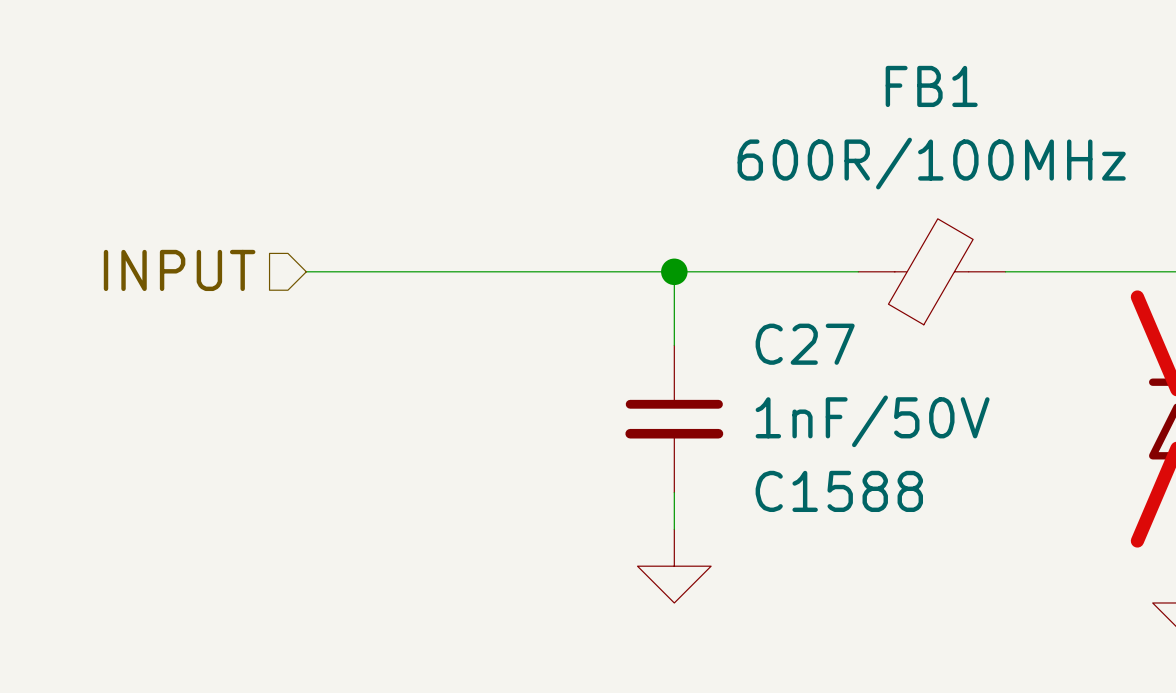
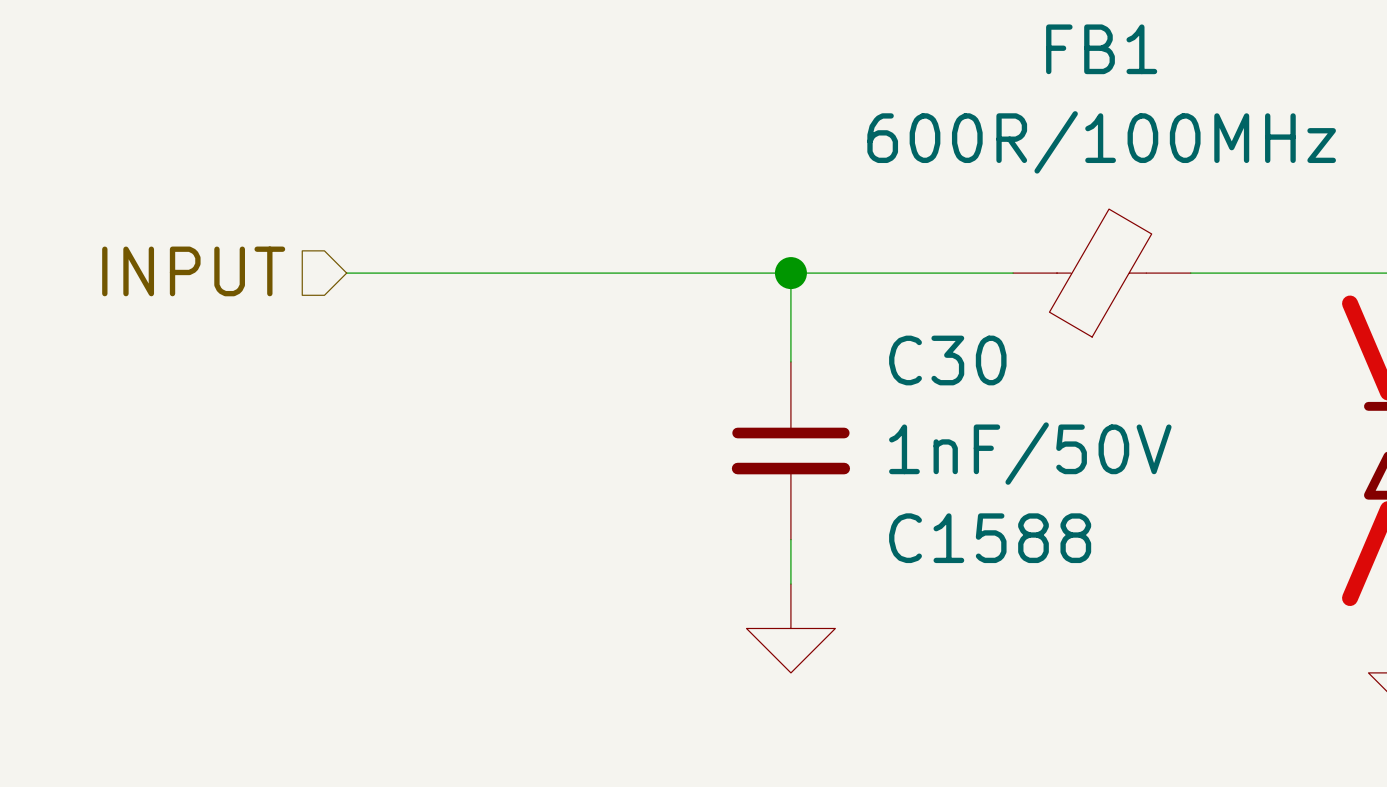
C27 name: C27 (805, 344) -> C30 (947, 360)

